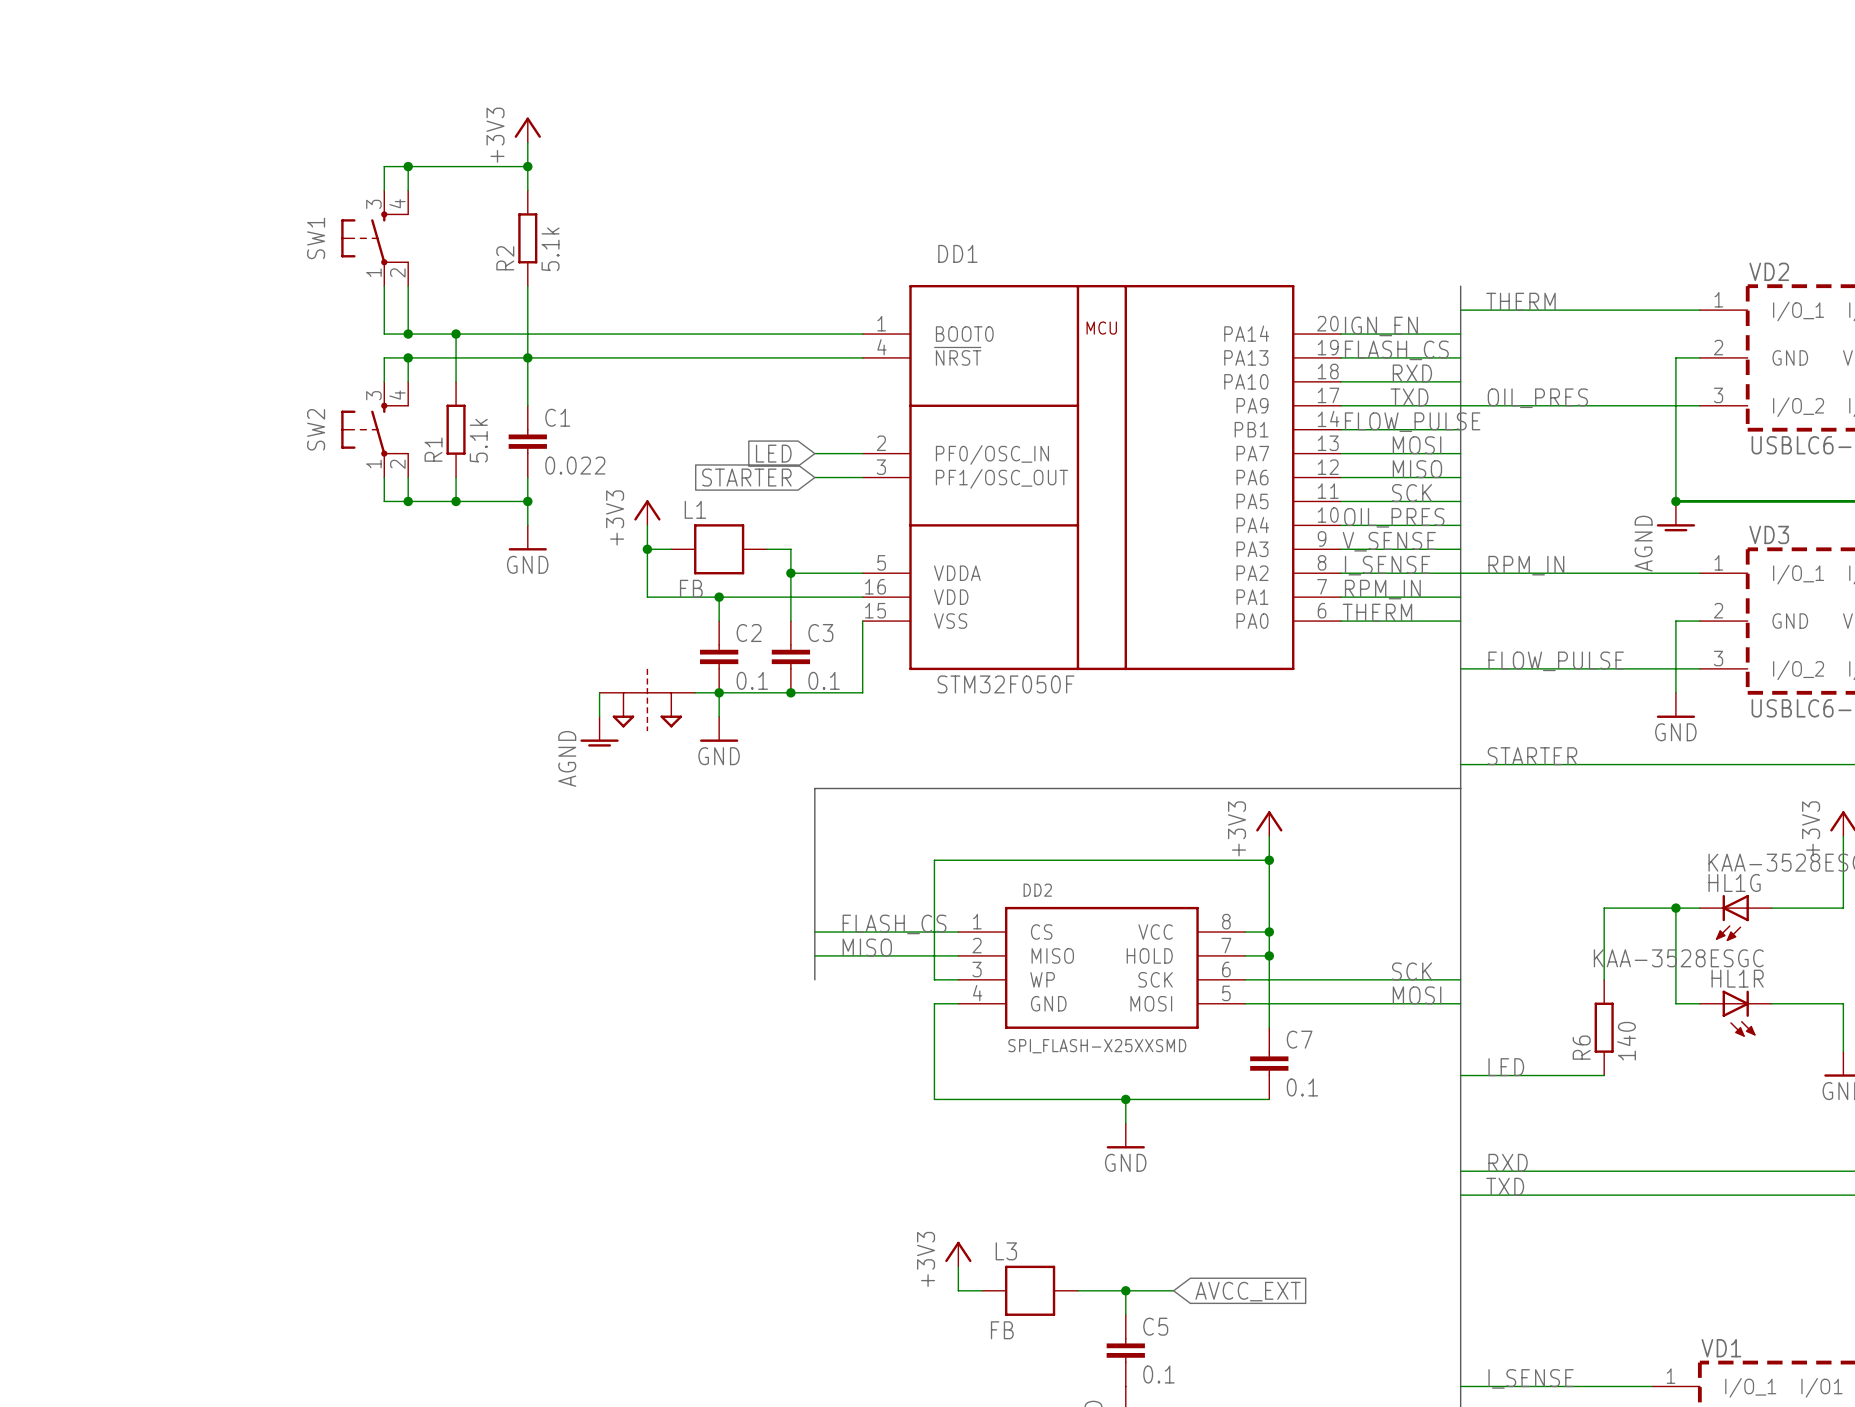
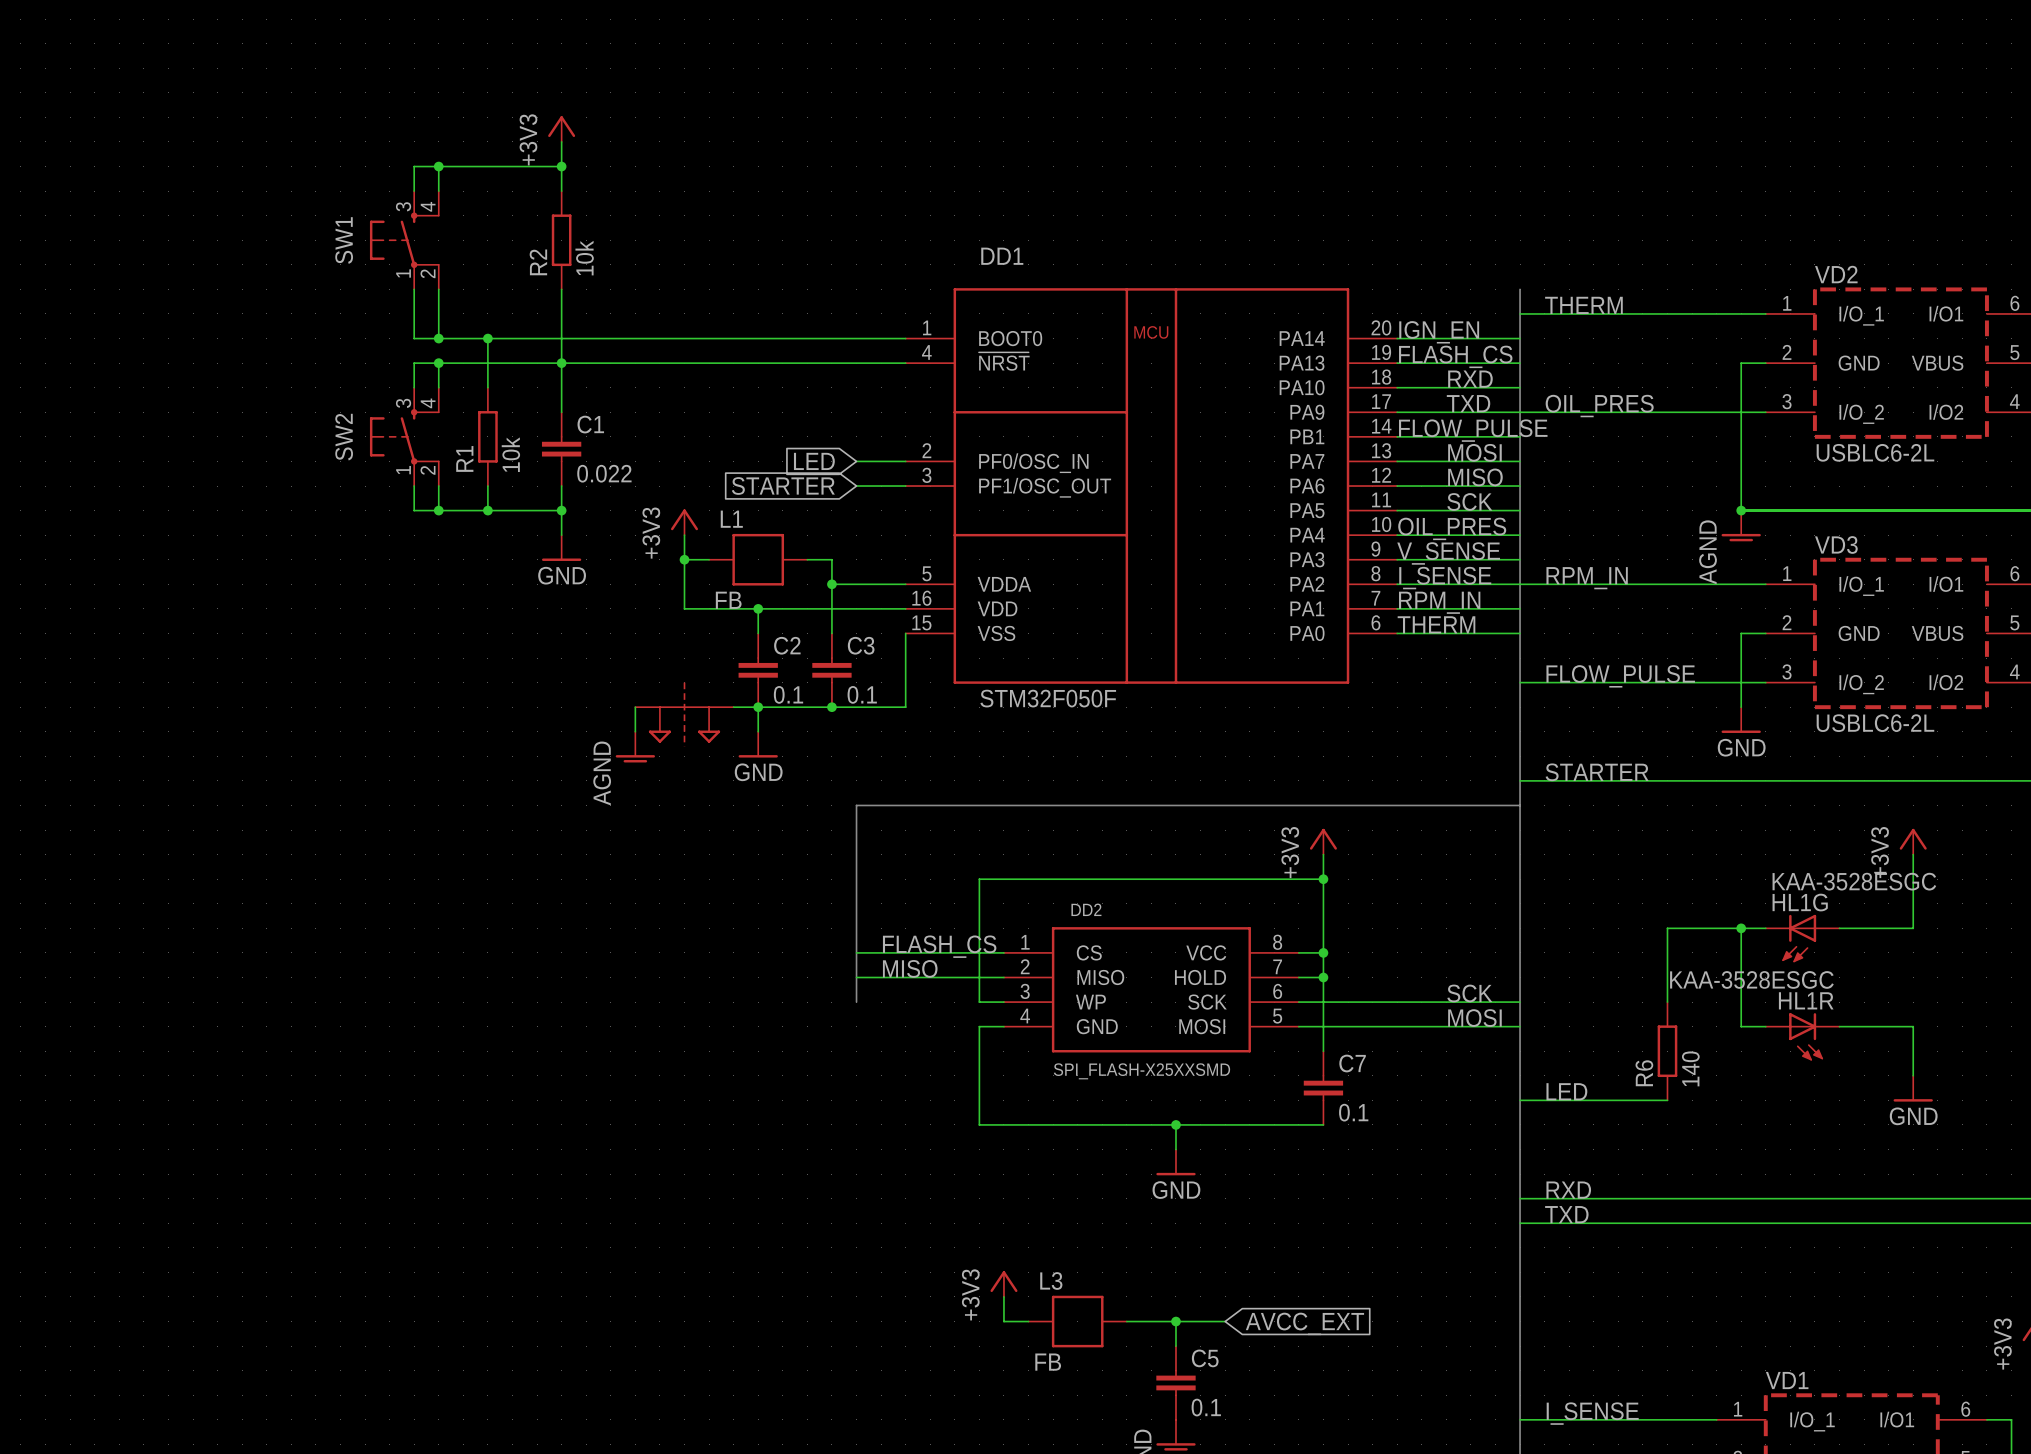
R2 value: 5.1k (550, 249) -> 10k (584, 258)
R1 value: 5.1k (478, 440) -> 10k (510, 454)

